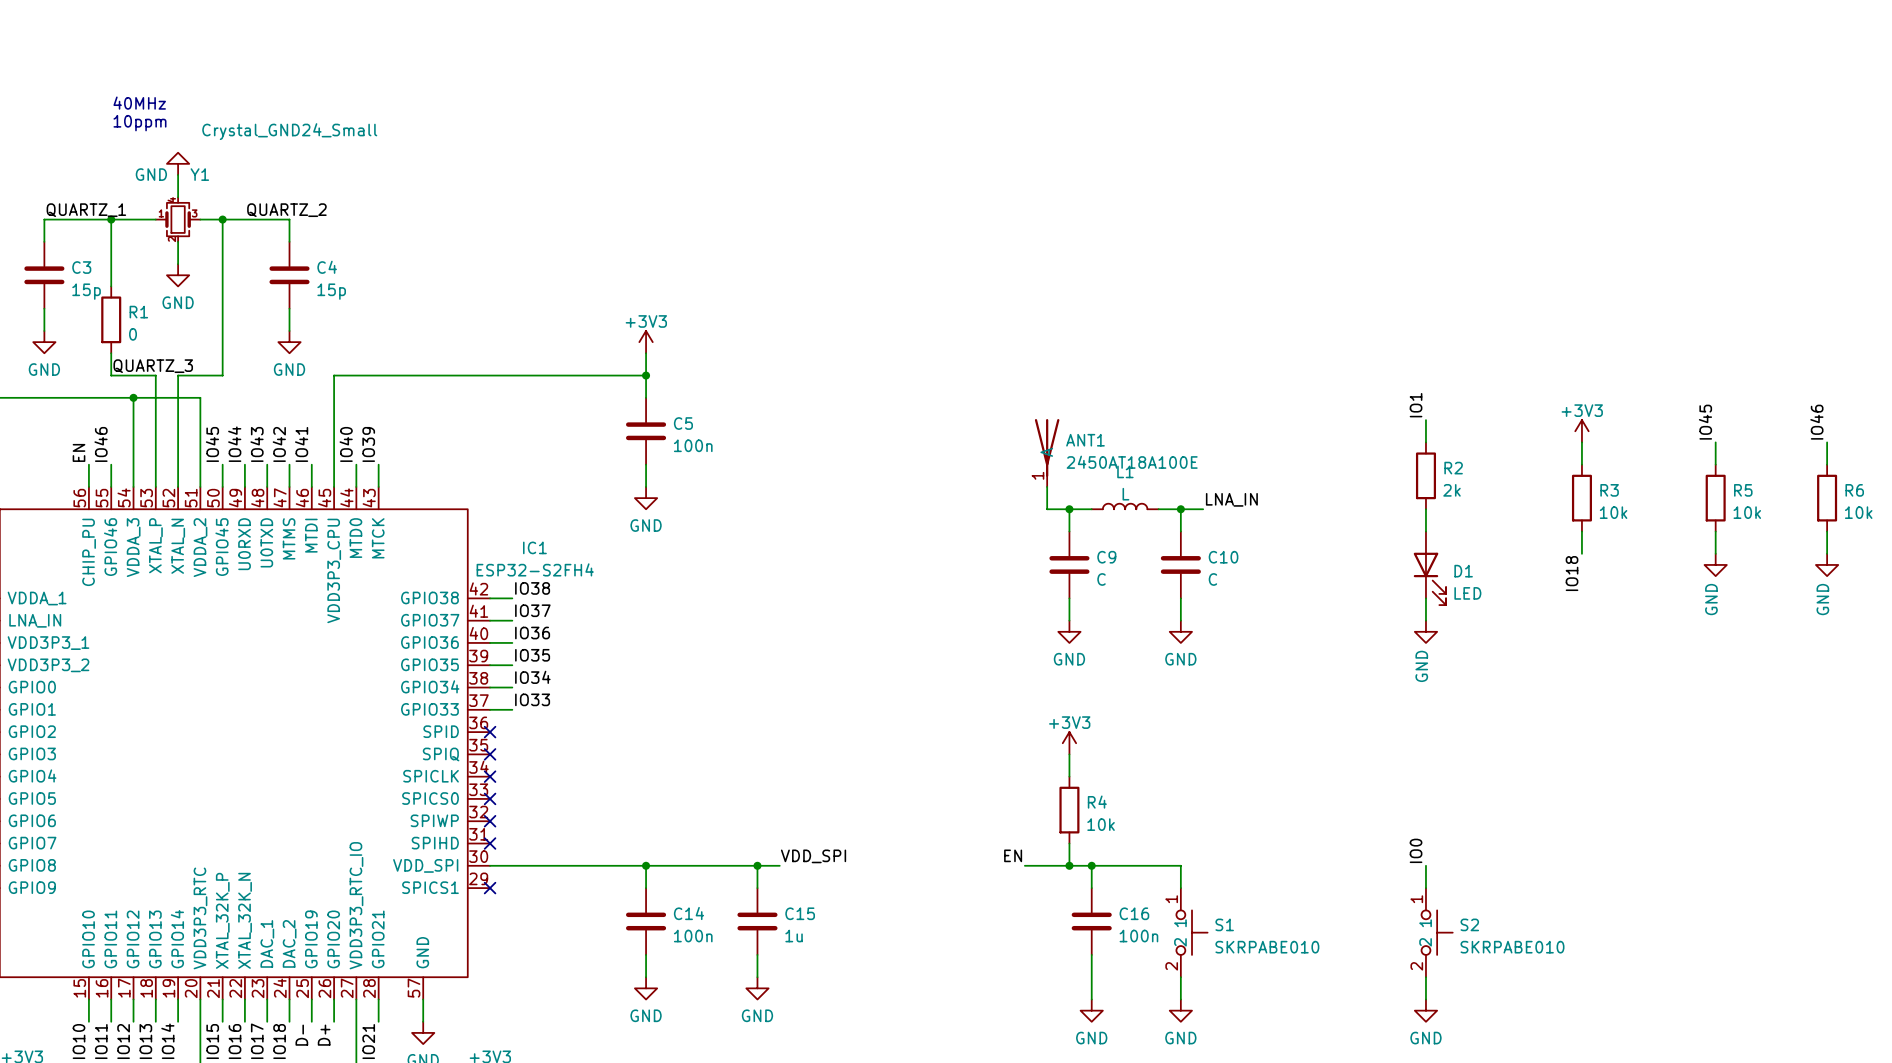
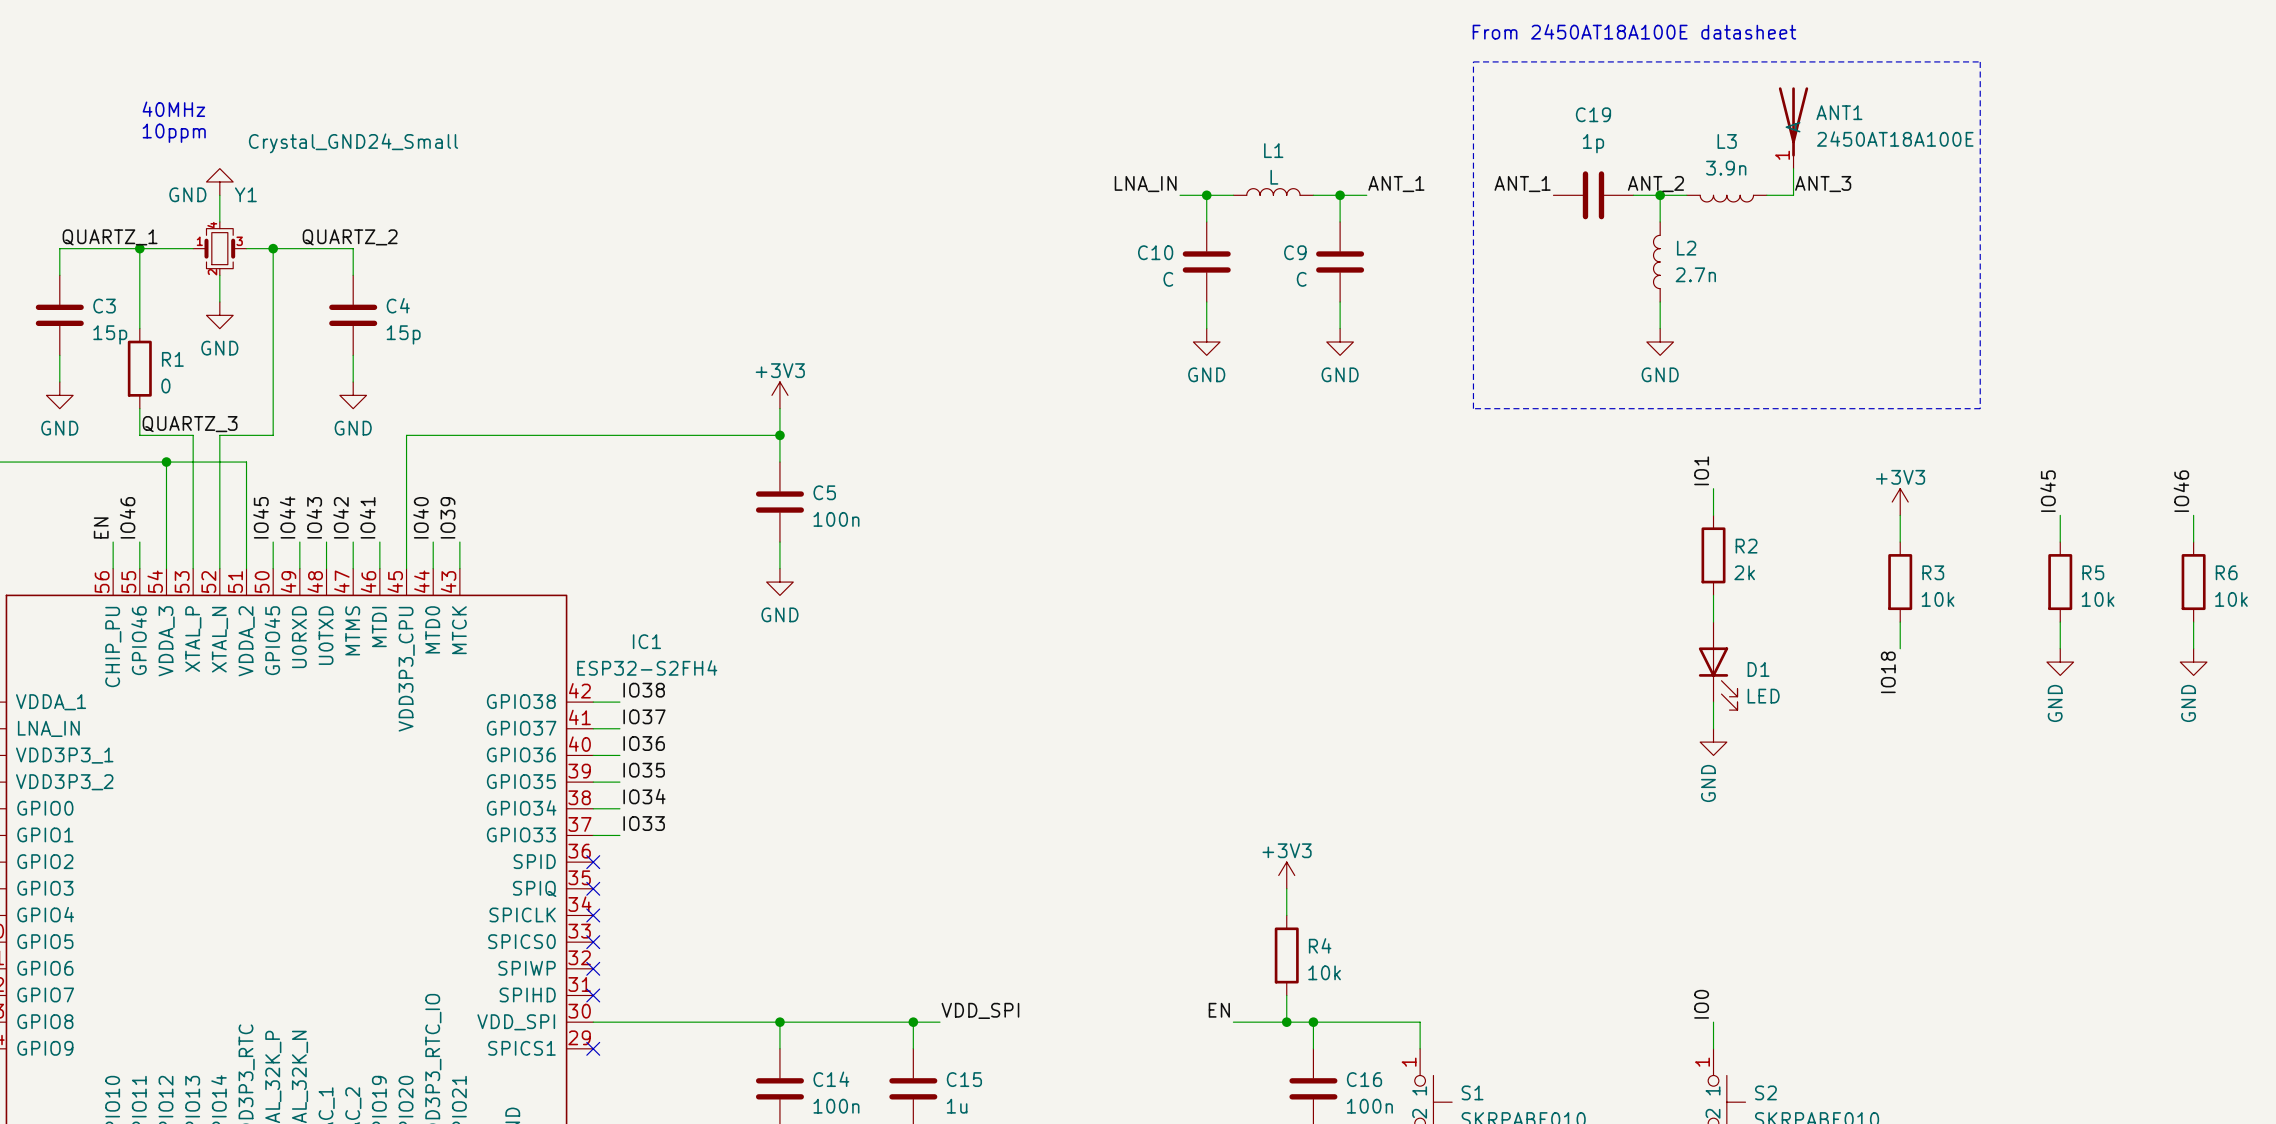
text: none -> From 2450AT18A100E datasheet (1634, 31)
line: none -> (1473, 61) (1980, 61) (1980, 408) (1473, 408) (1473, 61)
wire: none -> (1793, 168) (1793, 195) (1766, 195)
label: none -> LNA_IN (1145, 184)
label: none -> ANT_1 (1396, 184)
label: none -> ANT_1 (1522, 184)
label: none -> ANT_2 (1655, 184)
label: none -> ANT_3 (1823, 184)
wire: none -> (1180, 195) (1233, 195)
wire: none -> (1206, 195) (1206, 221)
junction: none -> (1206, 195)
wire: none -> (1313, 195) (1366, 195)
wire: none -> (1340, 195) (1340, 221)
junction: none -> (1340, 195)
C19: none -> 1p (1593, 195)
wire: none -> (1633, 195) (1686, 195)
wire: none -> (1660, 195) (1660, 221)
junction: none -> (1660, 195)
L3: none -> 3.9n (1726, 198)
L2: none -> 2.7n (1656, 261)
wire: none -> (1206, 301) (1206, 328)
wire: none -> (1340, 301) (1340, 328)
wire: none -> (1660, 301) (1660, 328)
power symbol: none -> GND (1206, 342)
power symbol: none -> GND (1340, 342)
power symbol: none -> GND (1660, 342)
ANT1 position: (1047, 452) -> (1793, 127)
wire: (1047, 486) (1047, 509) (1091, 509) -> none
label: LNA_IN (1231, 499) -> none
L1 position: (1125, 506) -> (1273, 191)
wire: (1069, 509) (1069, 531) -> none
junction: (1069, 509) -> none
wire: (1158, 509) (1203, 509) -> none
wire: (1180, 509) (1180, 531) -> none
junction: (1180, 509) -> none
C9 name position: C9 (1106, 557) -> C9 (1295, 252)
C10 name position: C10 (1223, 557) -> C10 (1155, 252)
C9 position: (1069, 564) -> (1340, 261)
C10 position: (1180, 564) -> (1206, 261)
C9 value position: C (1101, 579) -> C (1301, 279)
C10 value position: C (1212, 579) -> C (1168, 279)
wire: (1069, 598) (1069, 620) -> none
wire: (1180, 598) (1180, 620) -> none
power symbol: GND (1069, 631) -> none
power symbol: GND (1180, 631) -> none

